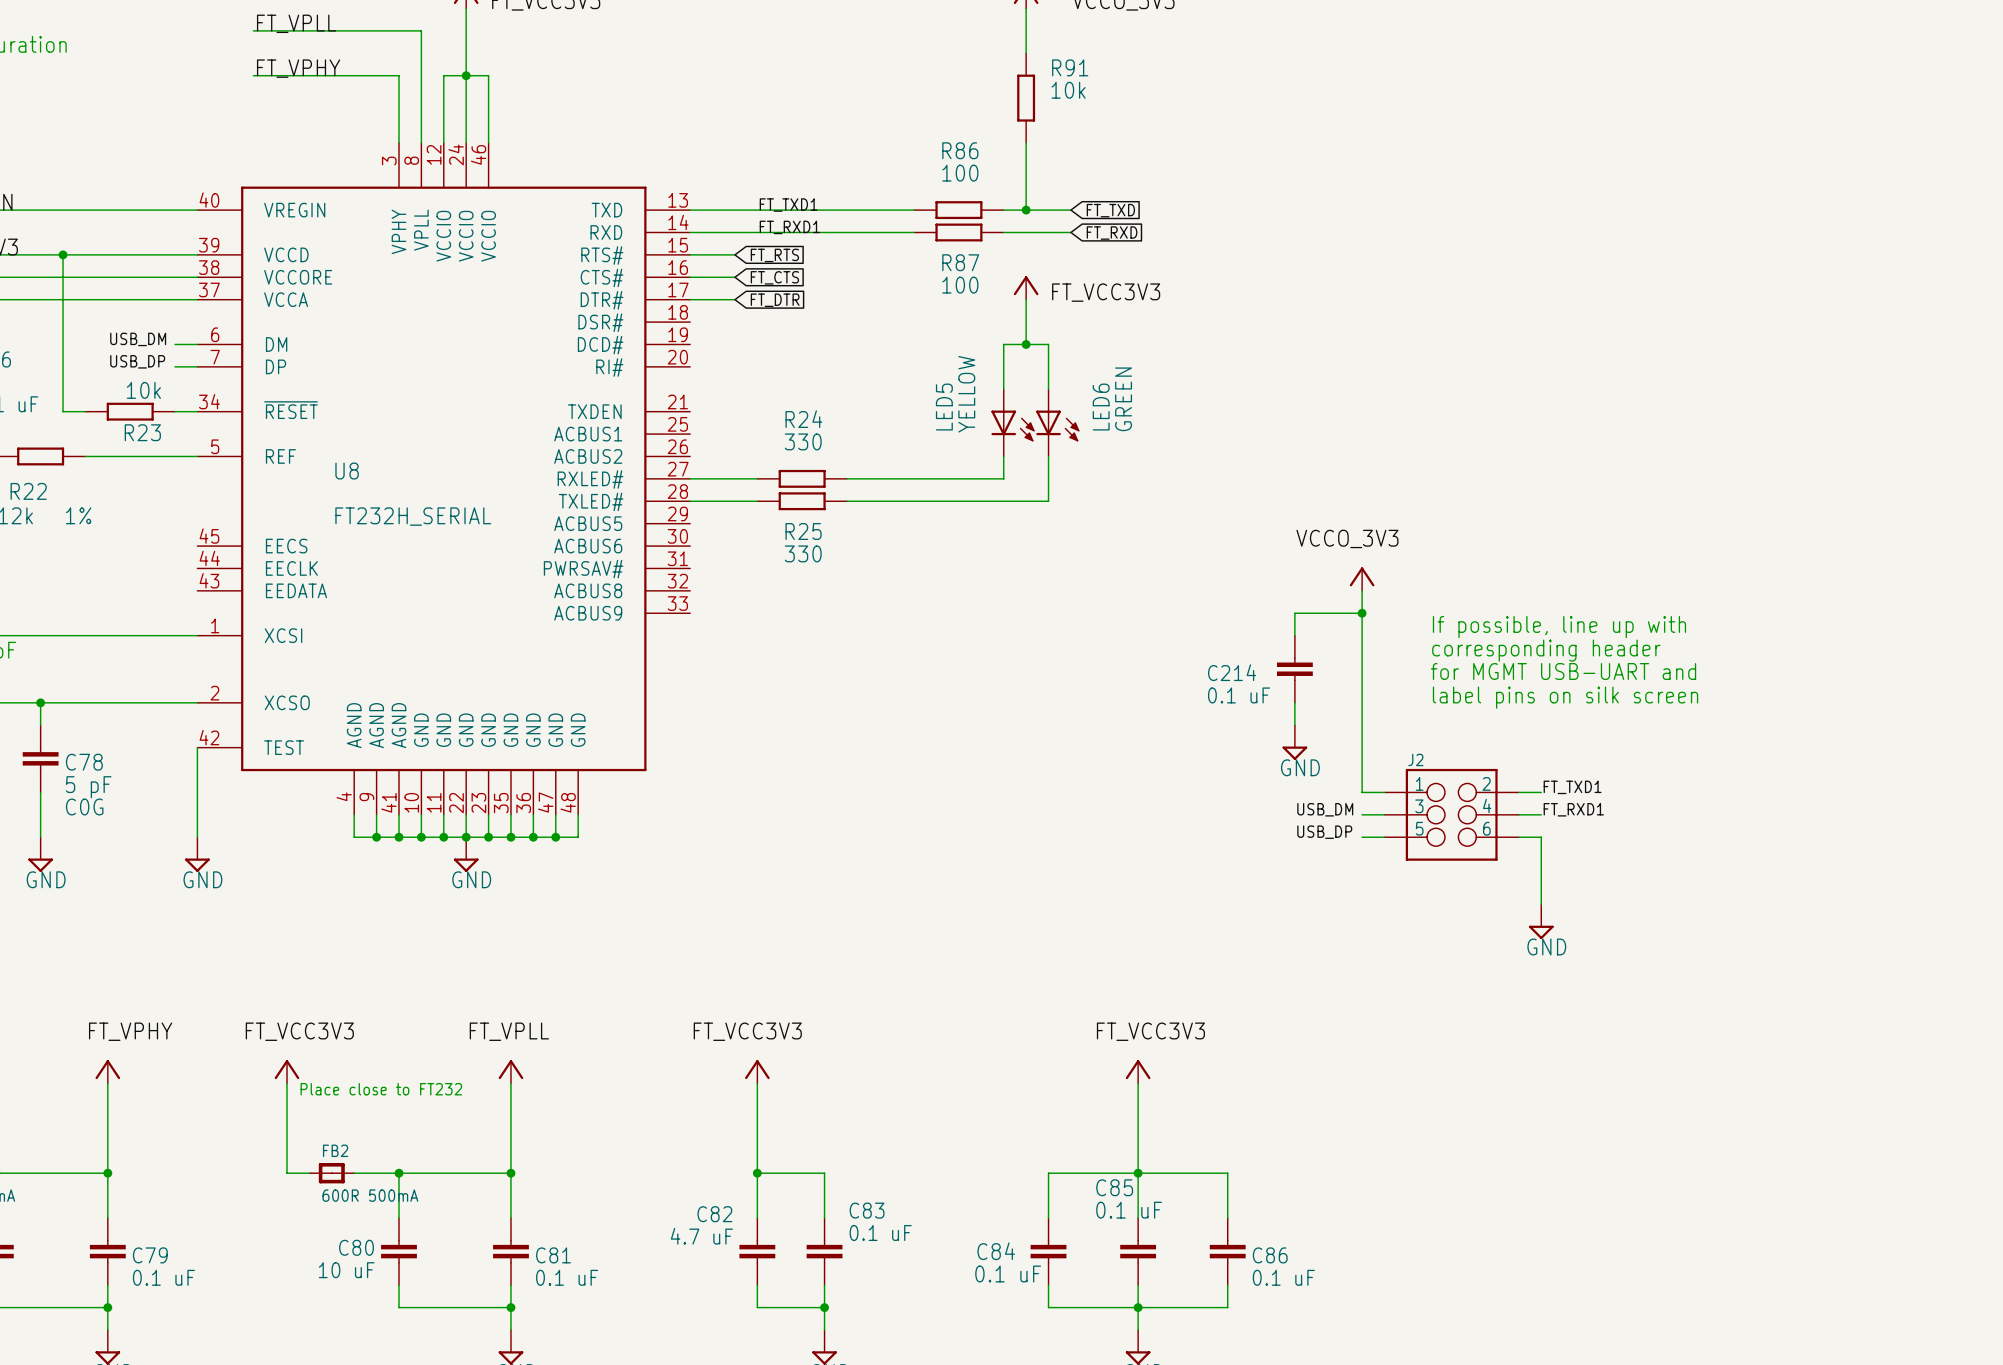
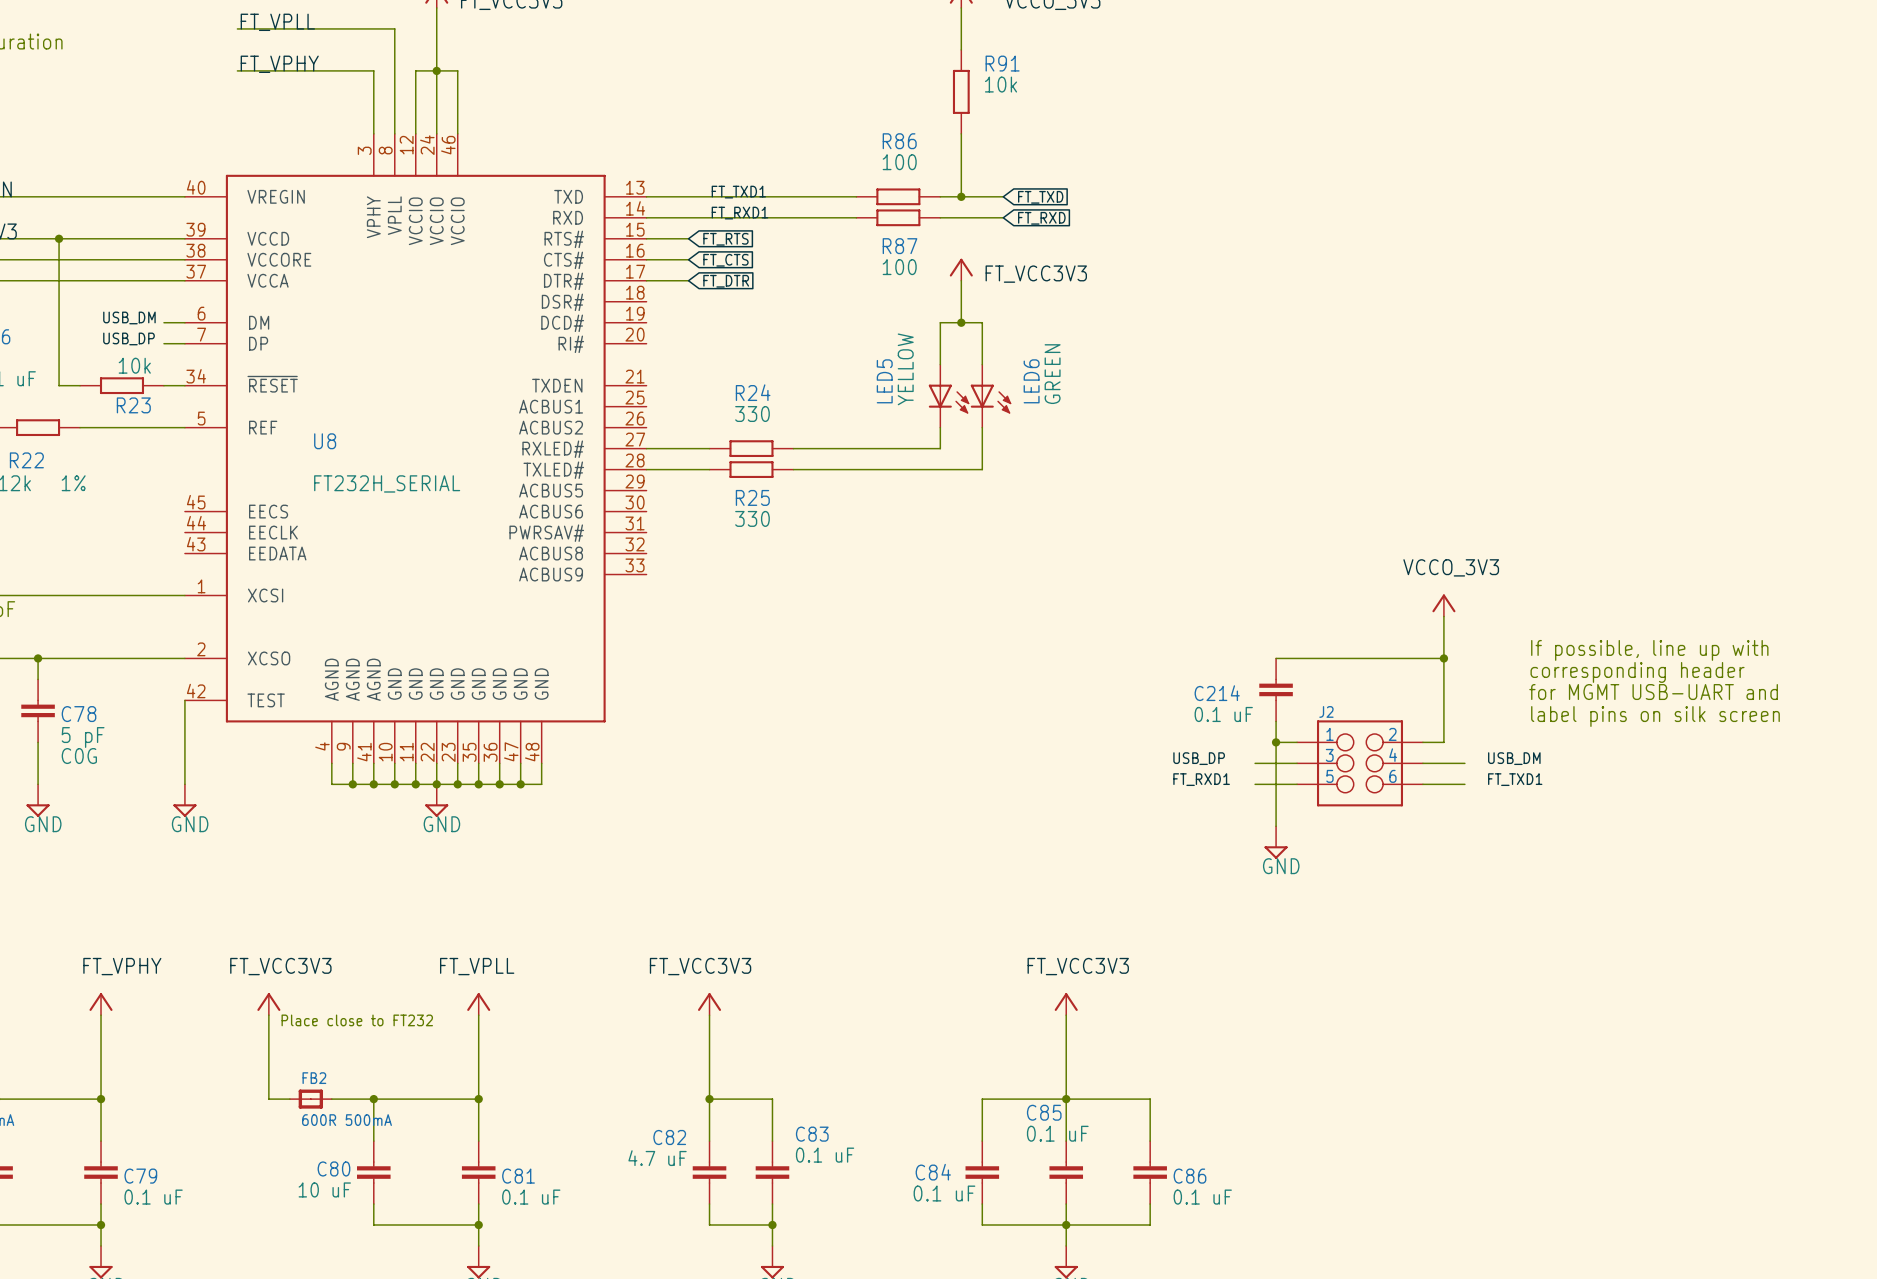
label position: VCCO_3V3 (1347, 538) -> VCCO_3V3 (1451, 567)
power symbol position: (1362, 579) -> (1443, 605)
wire: (1362, 590) (1362, 770) -> none
wire: (1362, 613) (1294, 613) (1294, 635) -> none
junction: (1362, 613) -> none
text position: If possible, line up with (1559, 627) -> If possible, line up with (1649, 650)
text position: corresponding header (1546, 650) -> corresponding header (1637, 672)
wire: none -> (1443, 616) (1443, 742)
C214 position: (1294, 669) -> (1276, 689)
text position: for MGMT USB-UART and (1563, 671) -> for MGMT USB-UART and (1653, 692)
text position: label pins on silk screen (1565, 697) -> label pins on silk screen (1655, 716)
wire: (1294, 702) (1294, 725) -> none
wire: none -> (1276, 658) (1443, 658)
junction: none -> (1443, 658)
power symbol: GND (1294, 742) -> none
label position: FT_TXD1 (1572, 787) -> FT_TXD1 (1515, 779)
wire: none -> (1276, 742) (1276, 826)
junction: none -> (1276, 742)
label: USB_DM (1325, 809) -> none
label: FT_RXD1 (1573, 809) -> none
label: none -> USB_DM (1514, 758)
wire: none -> (1255, 763) (1276, 763)
wire: none -> (1443, 763) (1464, 763)
label: none -> FT_RXD1 (1201, 779)
label position: USB_DP (1324, 832) -> USB_DP (1199, 758)
wire: none -> (1255, 784) (1276, 784)
wire: (1541, 837) (1541, 904) -> (1443, 784) (1464, 784)
power symbol: none -> GND (1276, 842)
power symbol: GND (1541, 921) -> none

